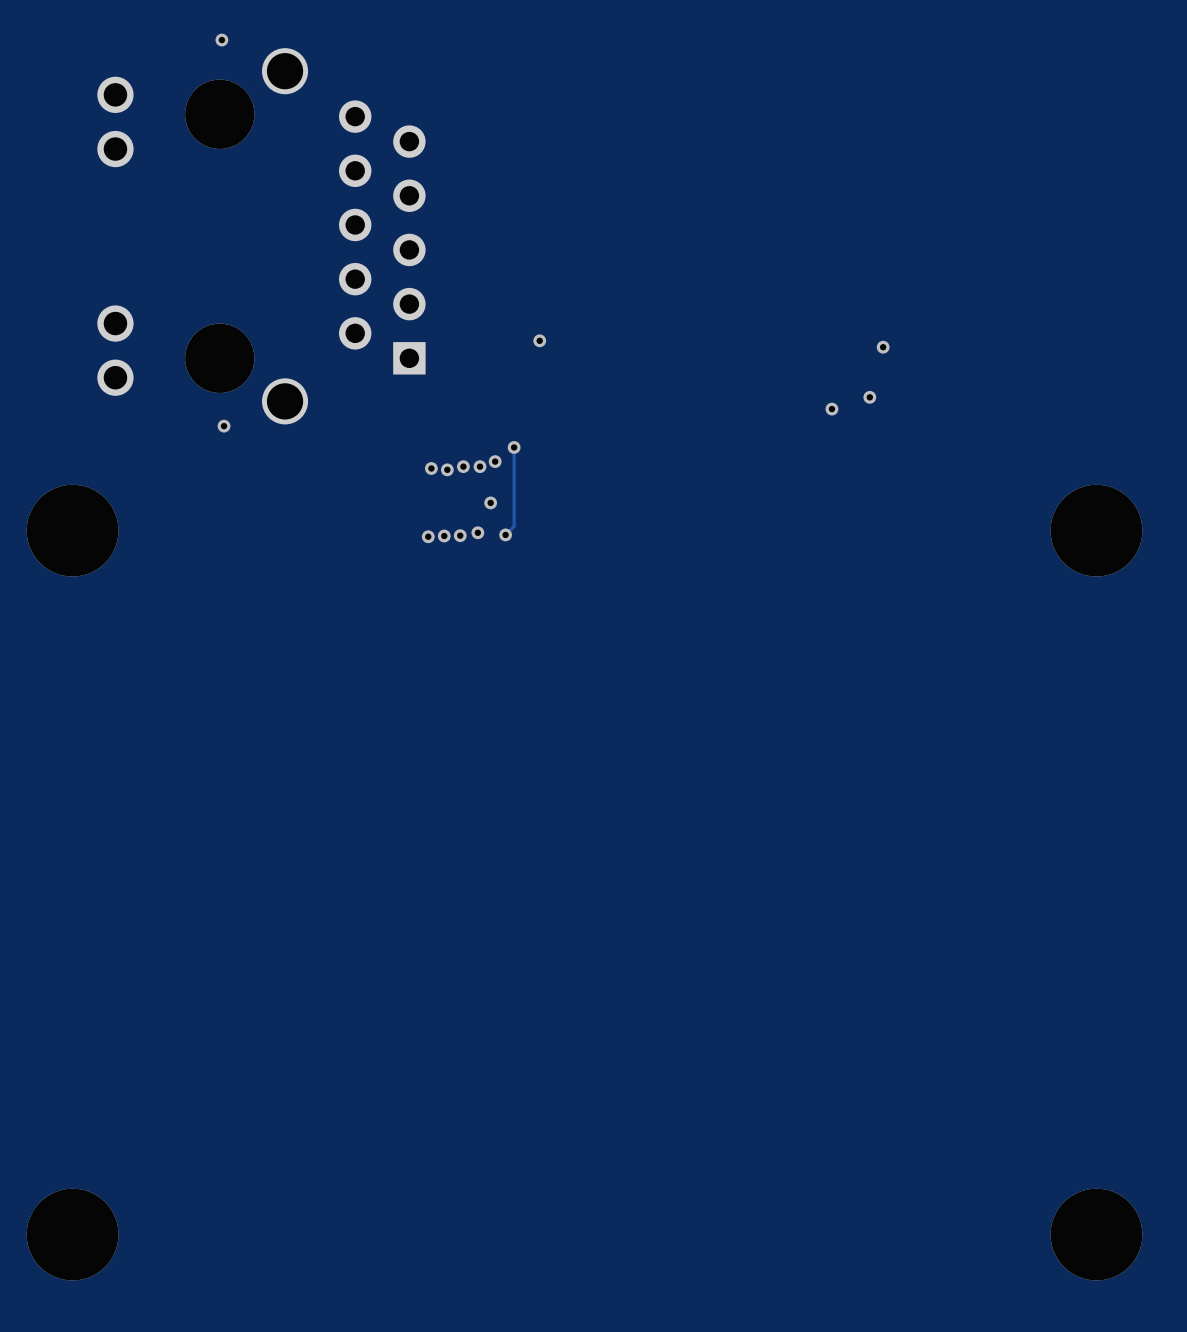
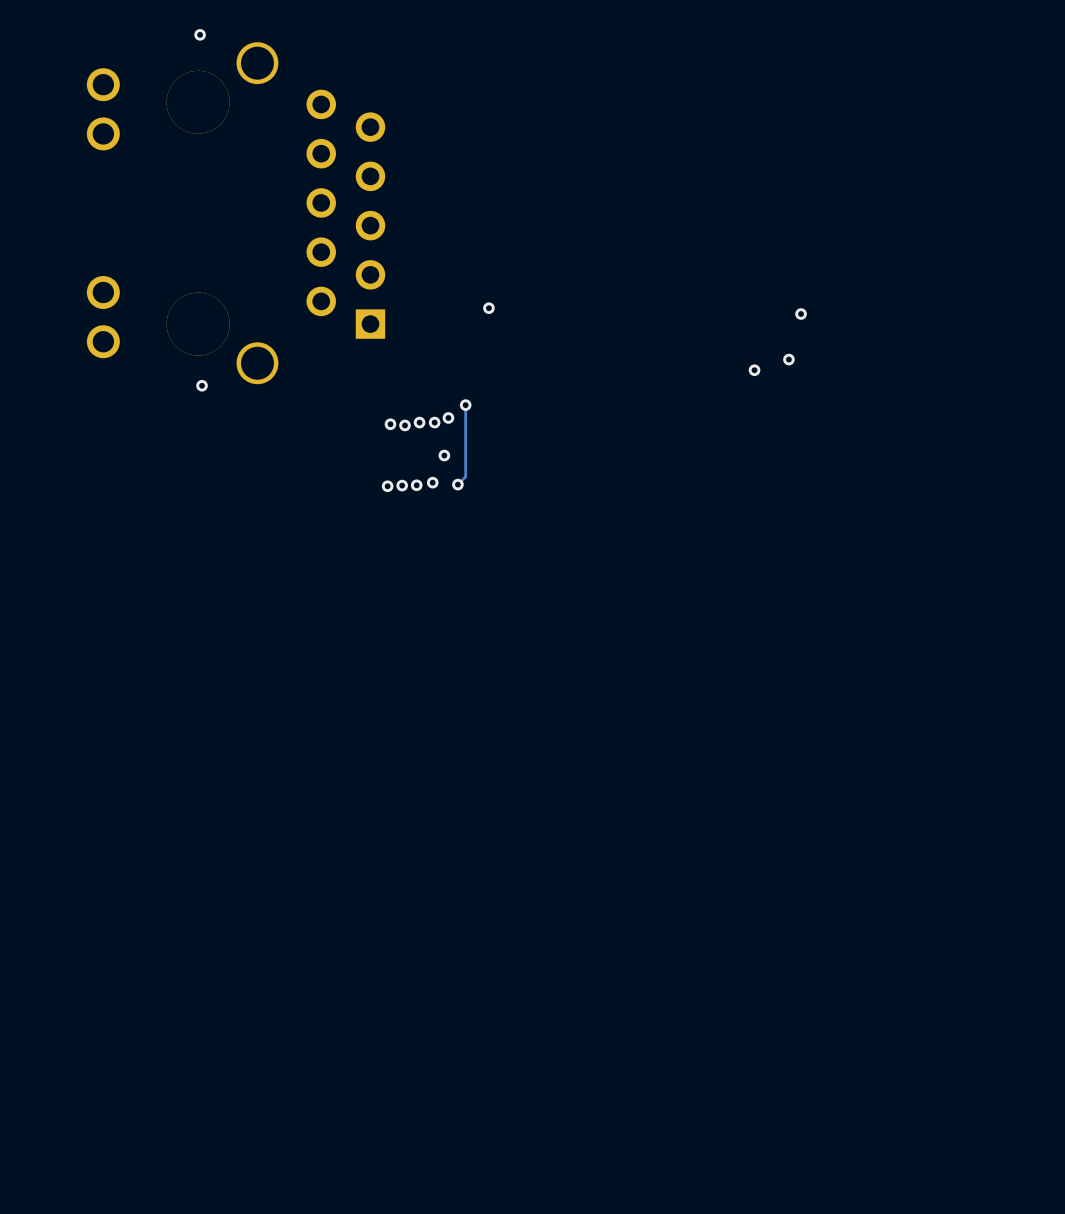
part: (72, 530) -> none
part: (1096, 530) -> none
part: (72, 1234) -> none
part: (1096, 1234) -> none

